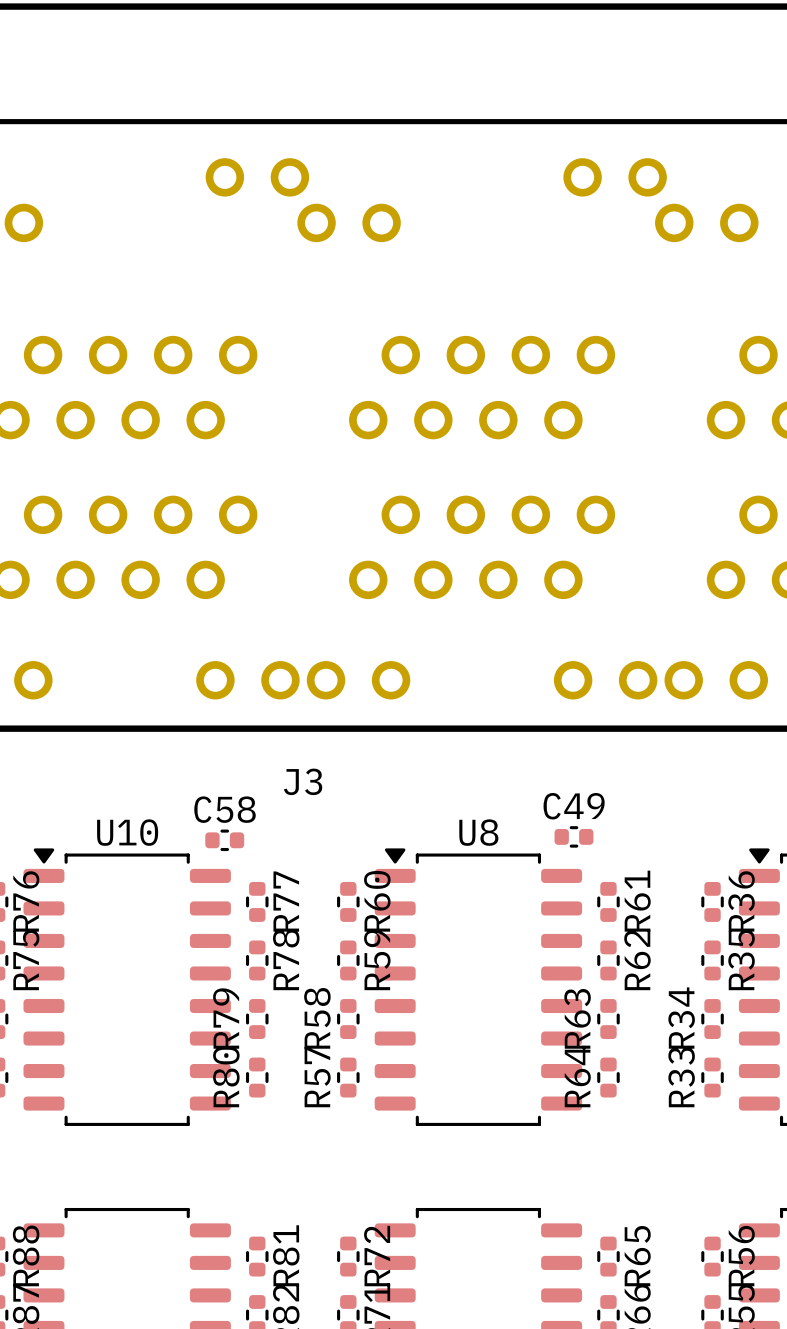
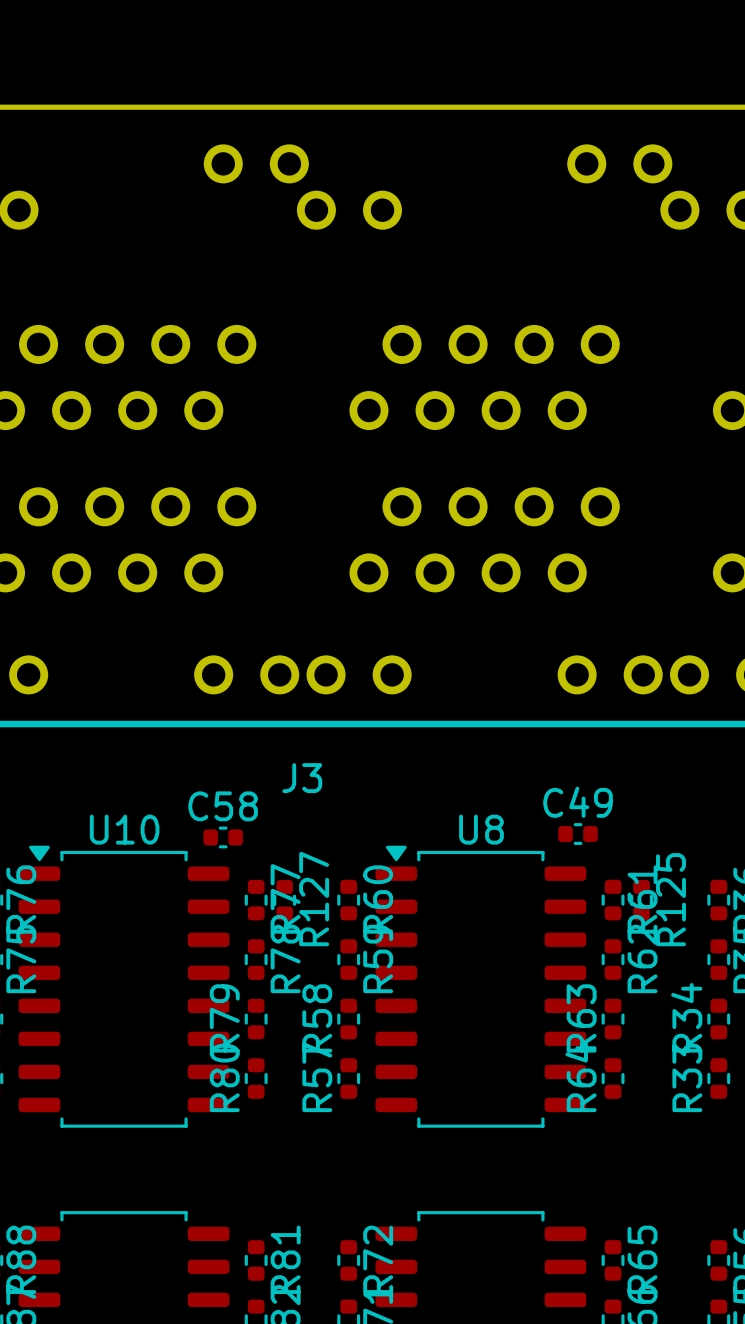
R127: none -> (284, 900)
R125: none -> (641, 900)

